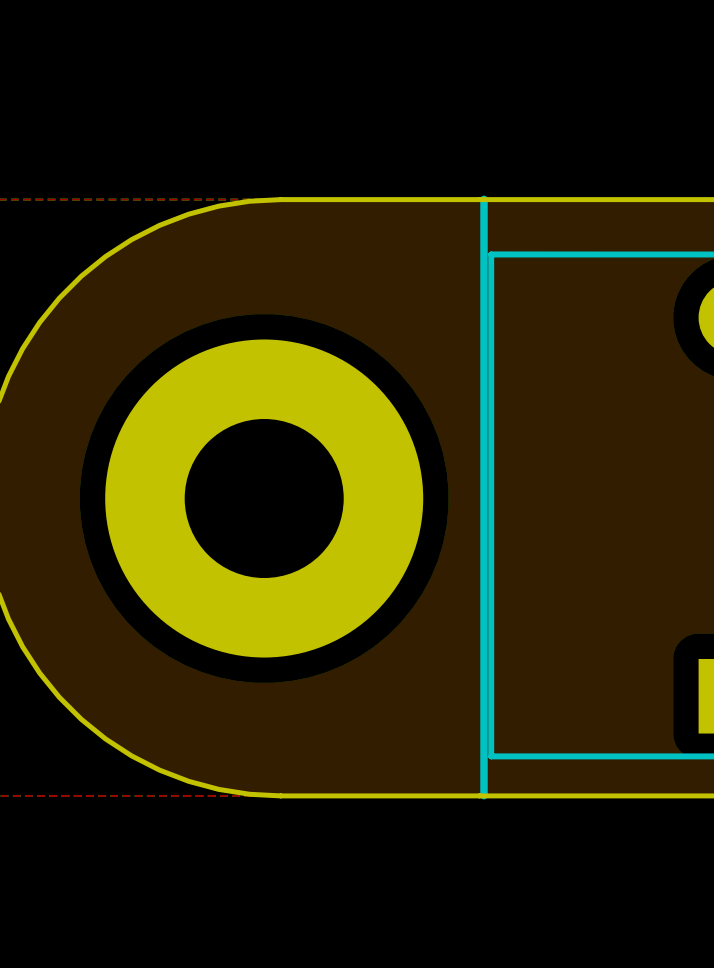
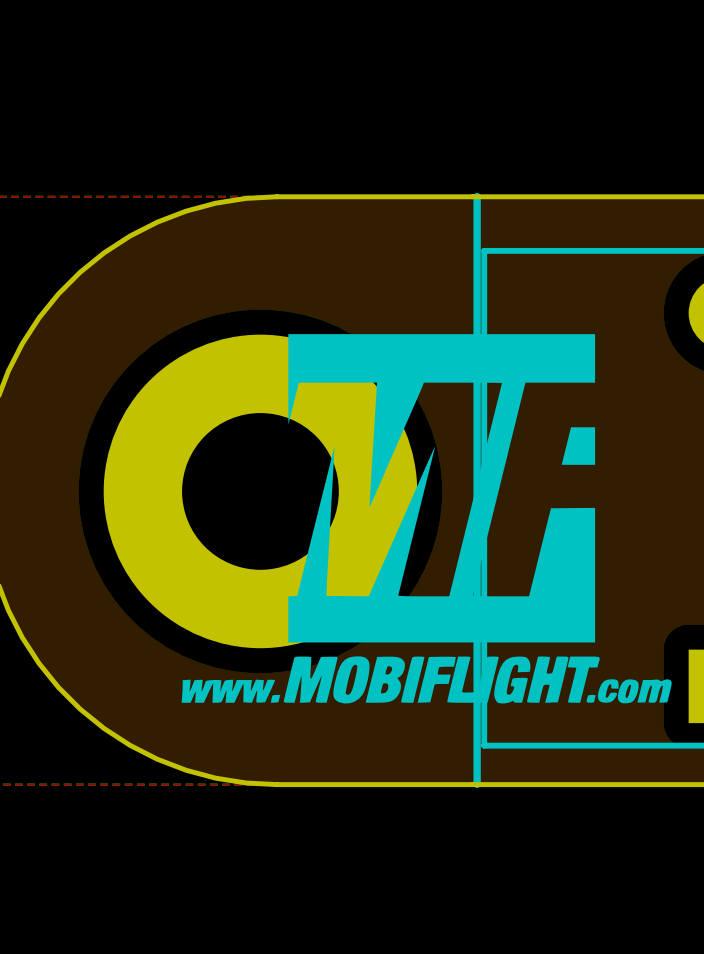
drawing: none -> [181, 334, 672, 704]

